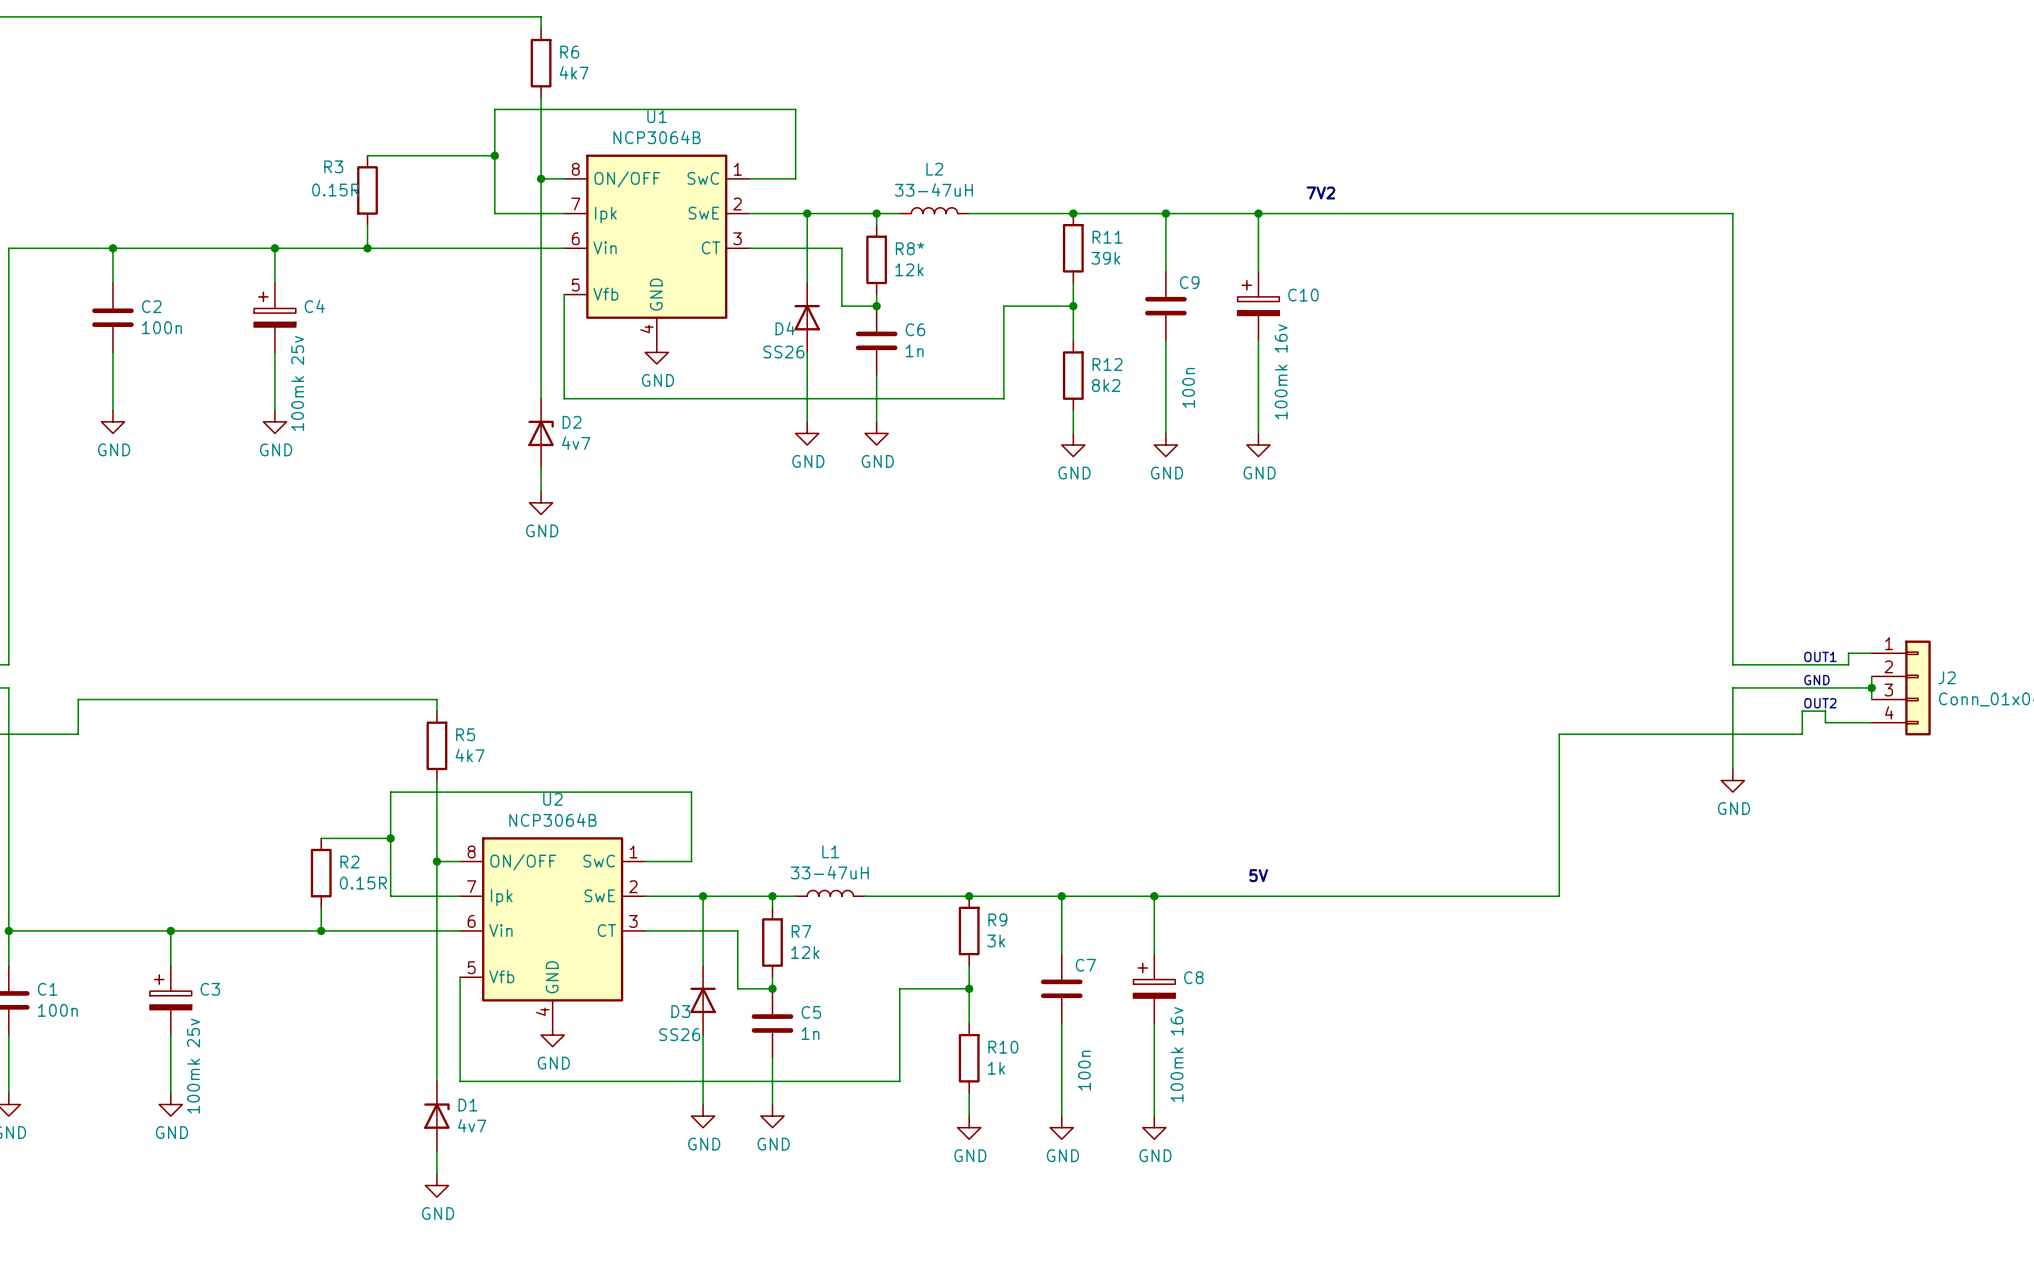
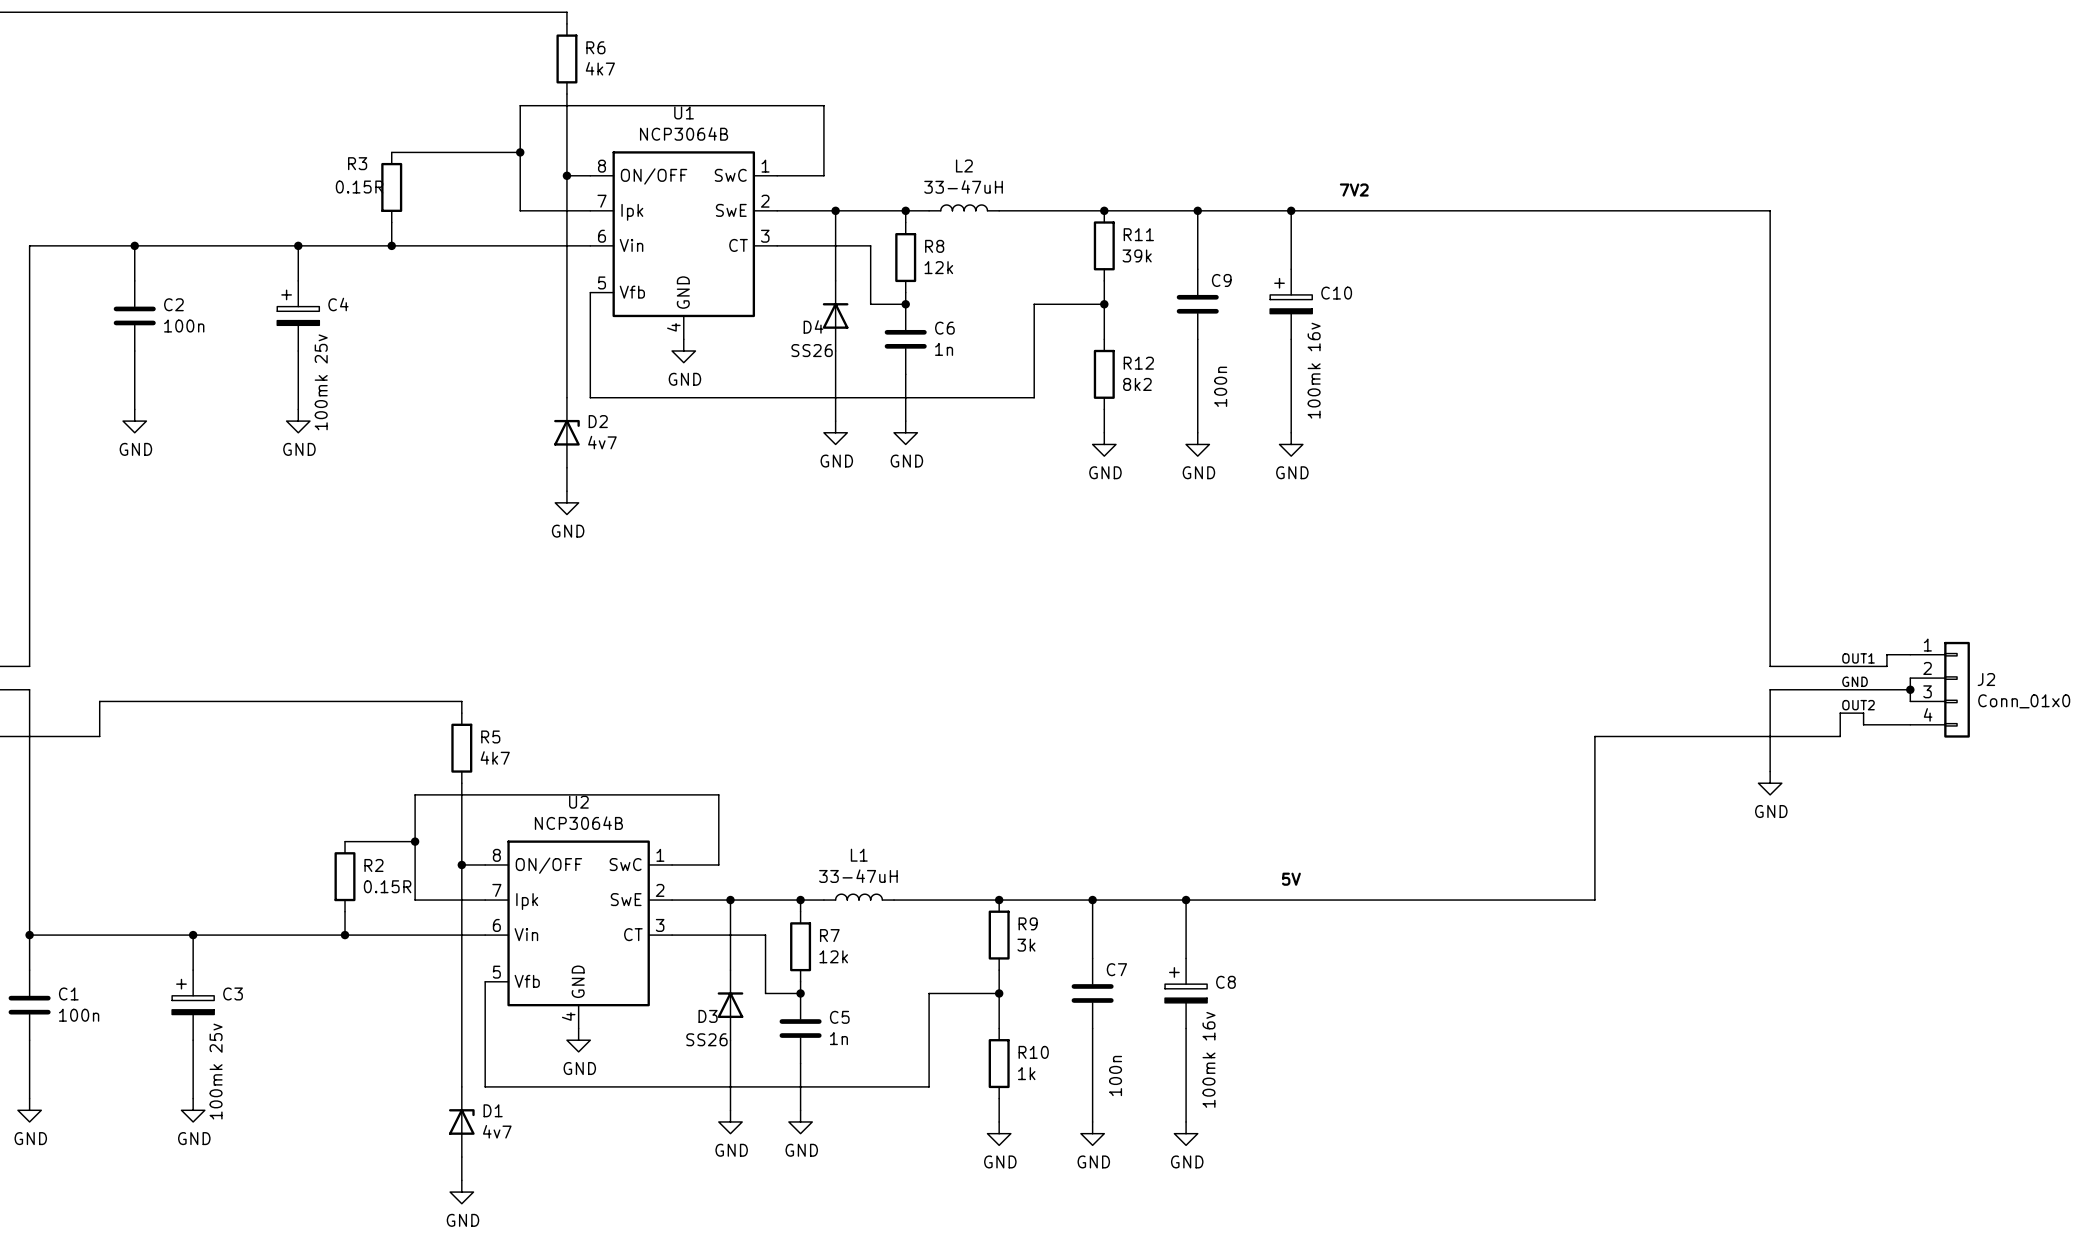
R8* name: R8* (909, 248) -> R8 (934, 246)

